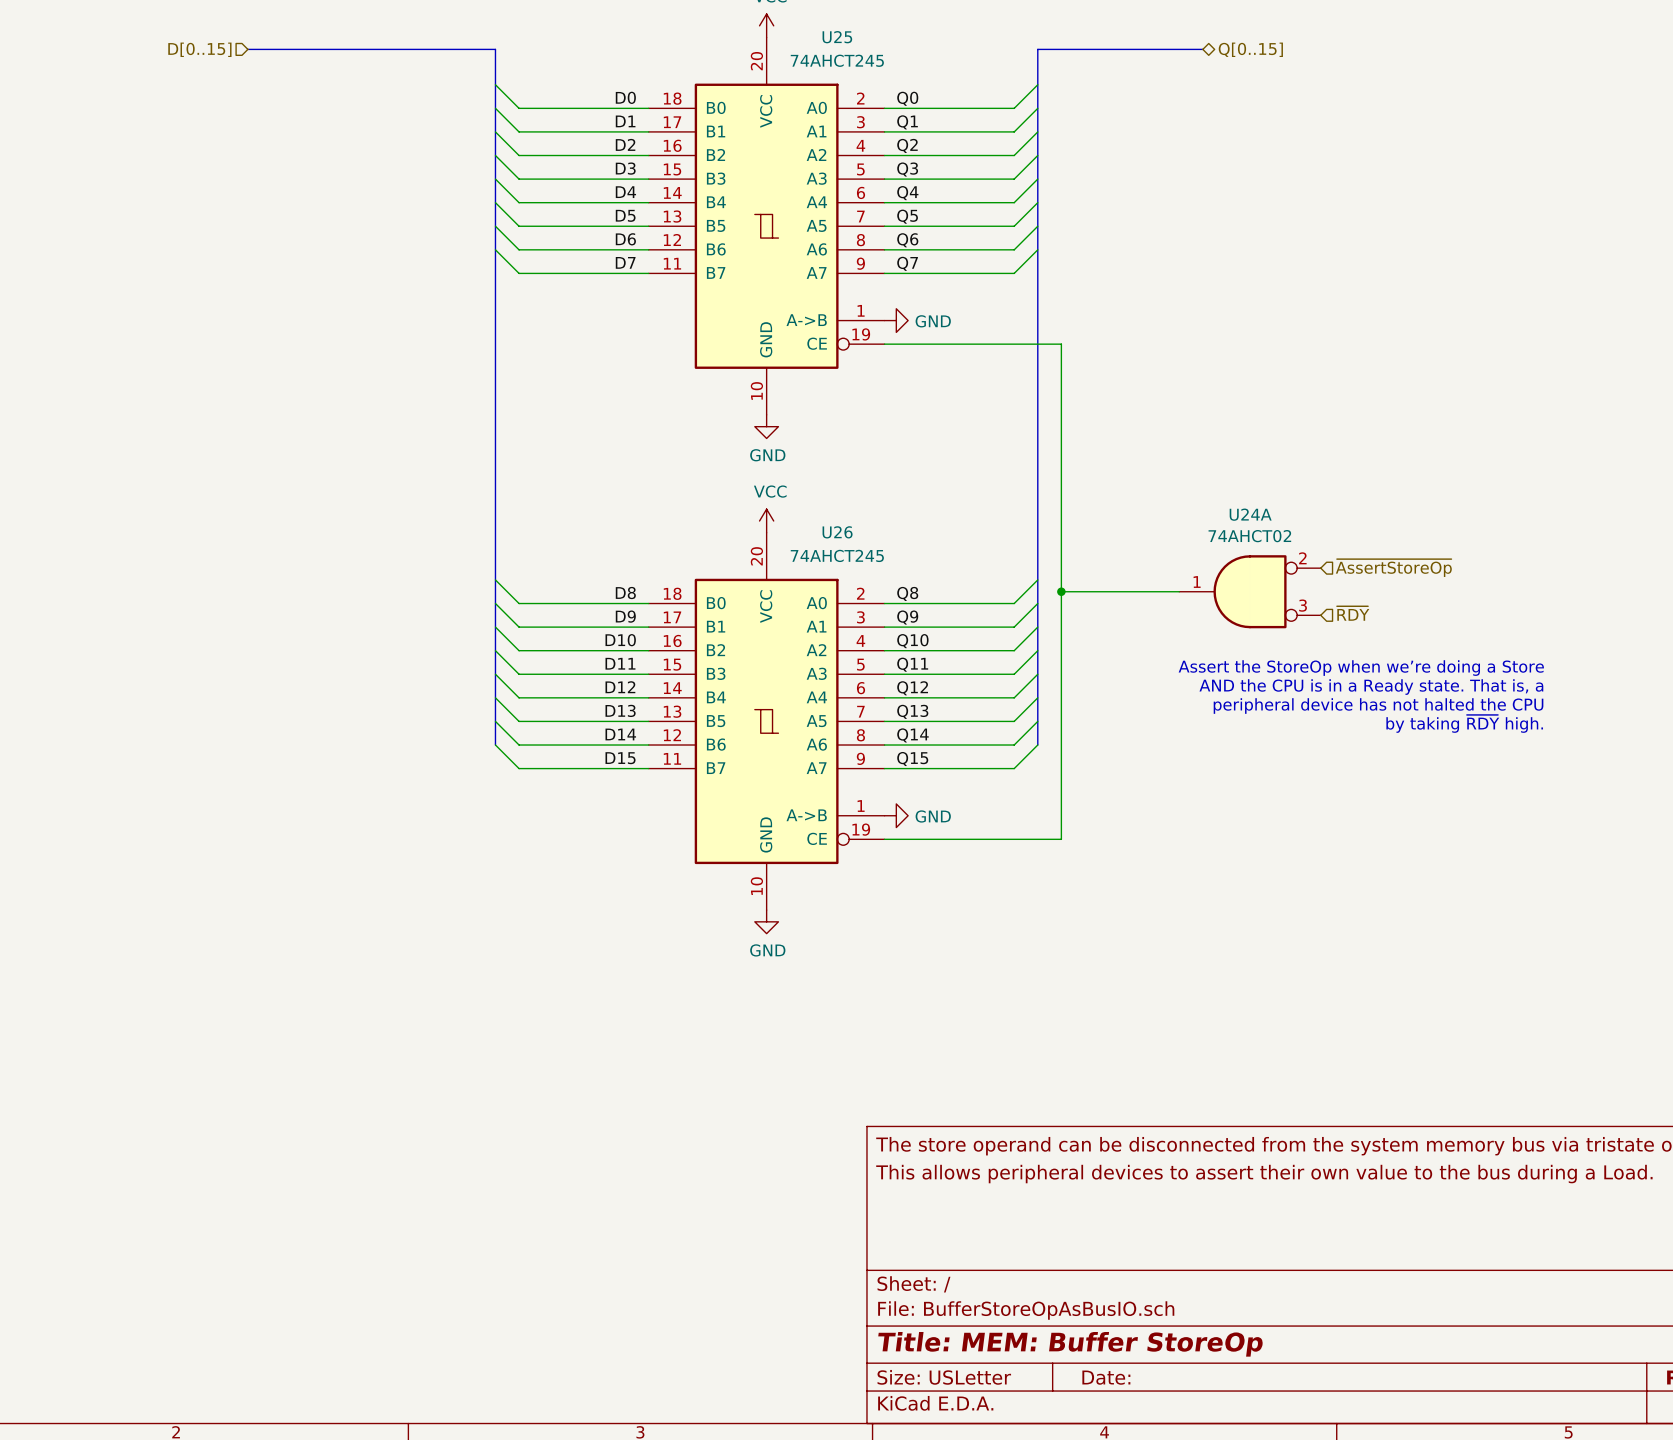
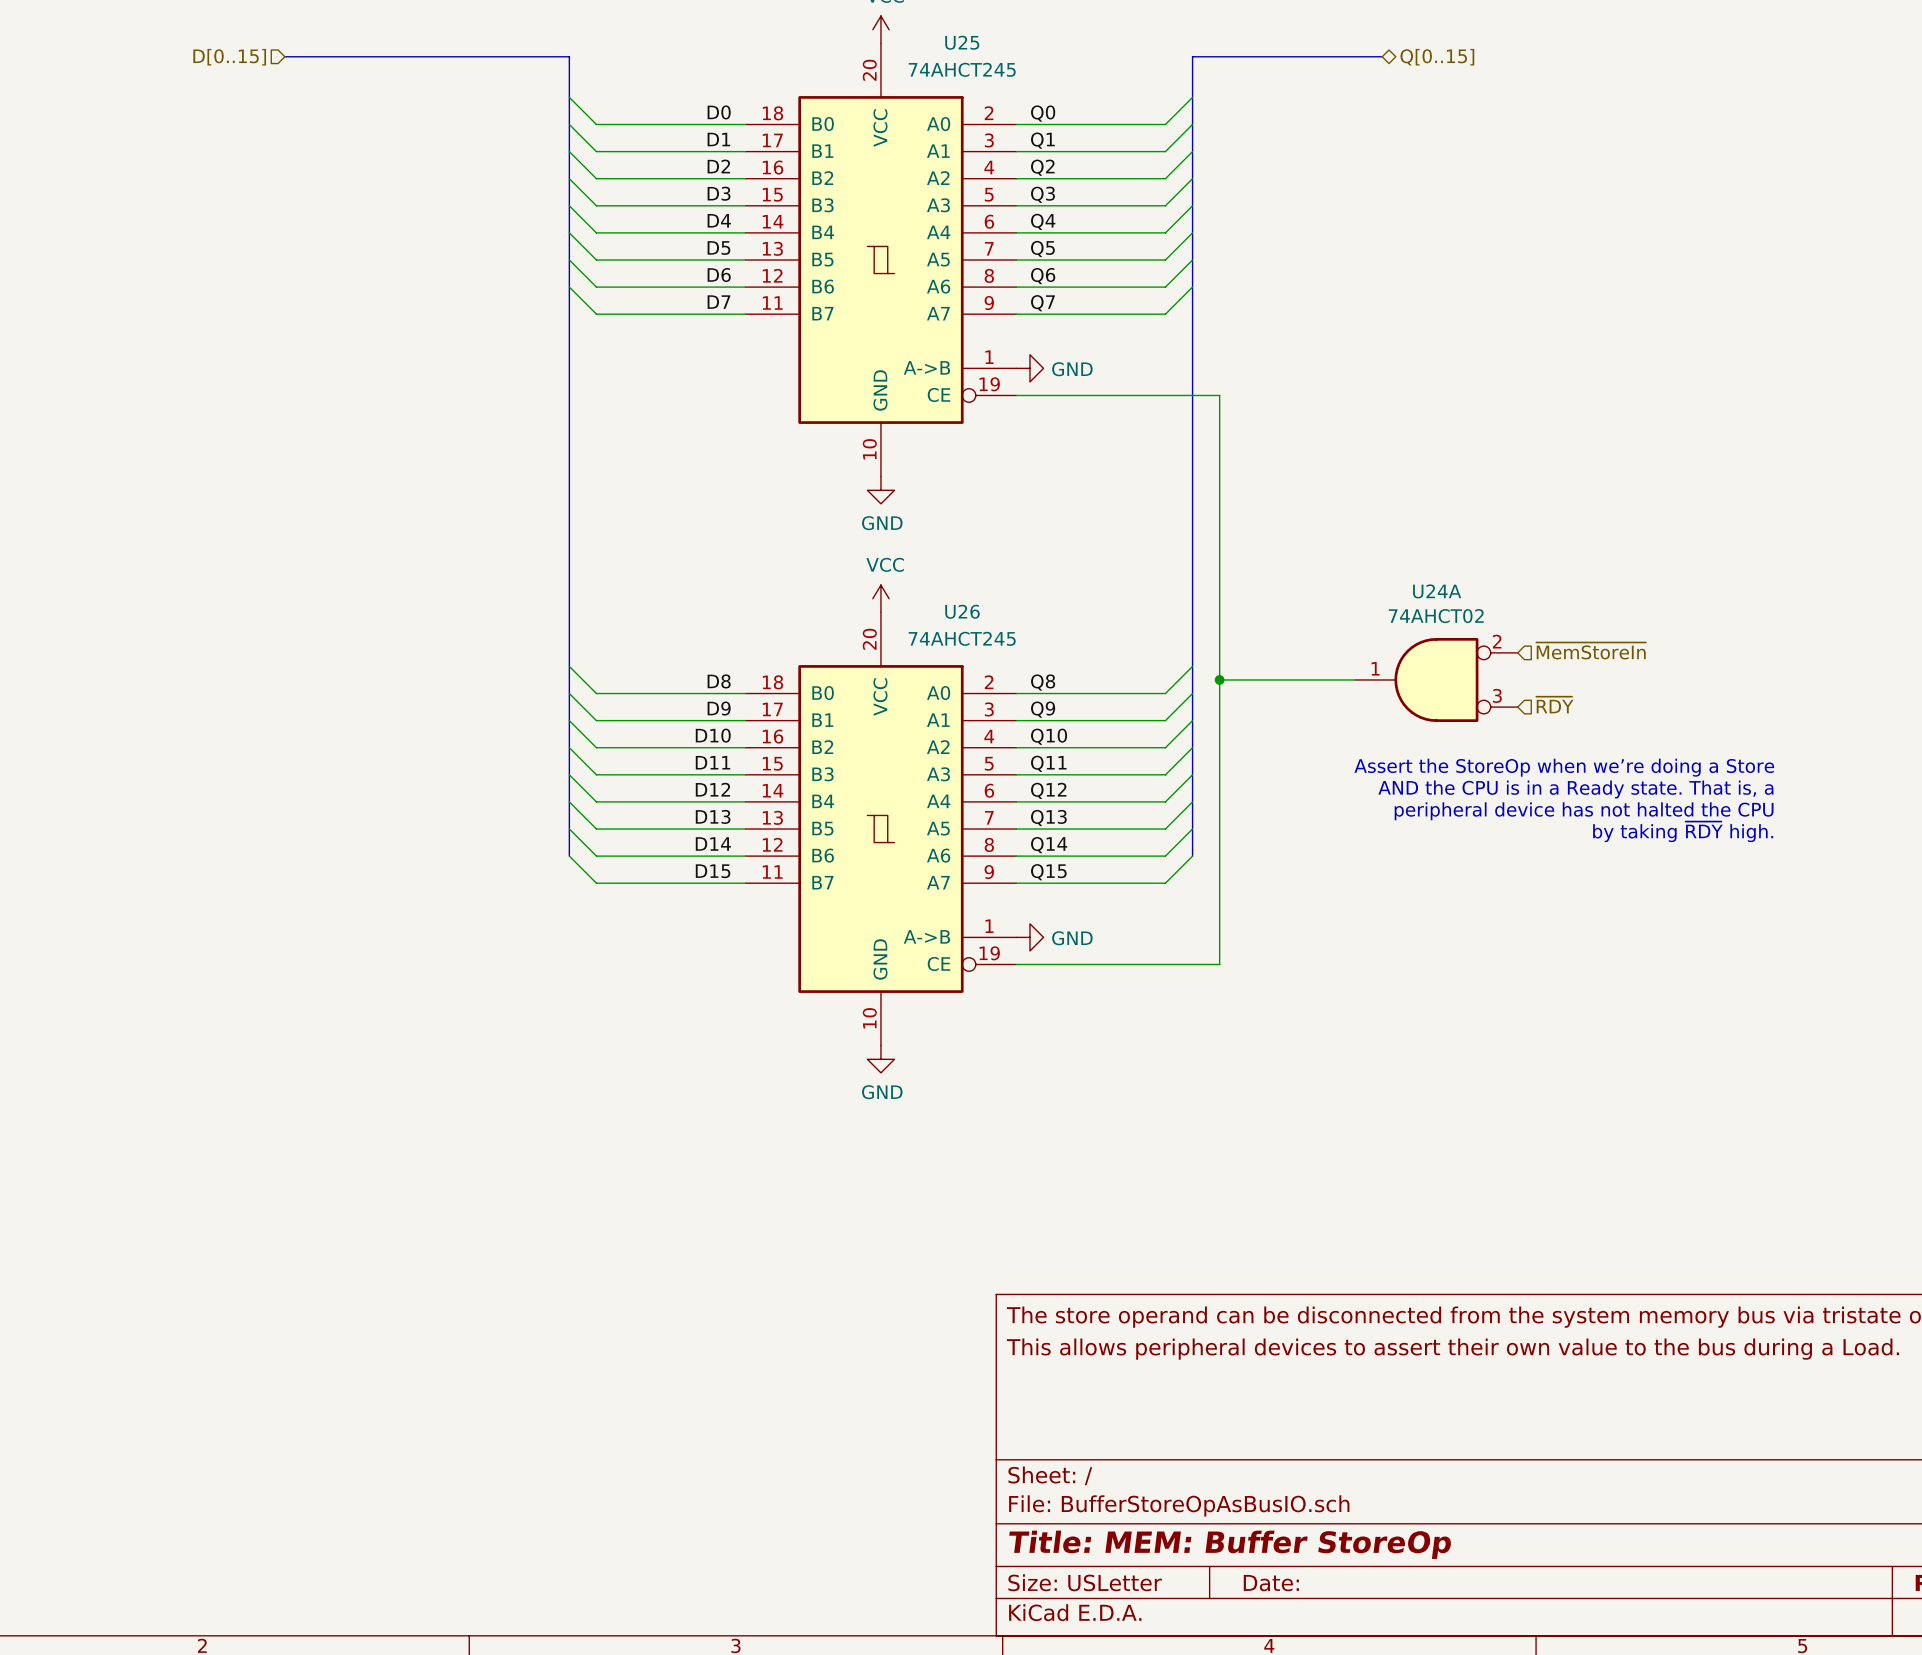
hierarchical label: ~{AssertStoreOp} (1393, 568) -> ~{MemStoreIn} (1591, 650)

